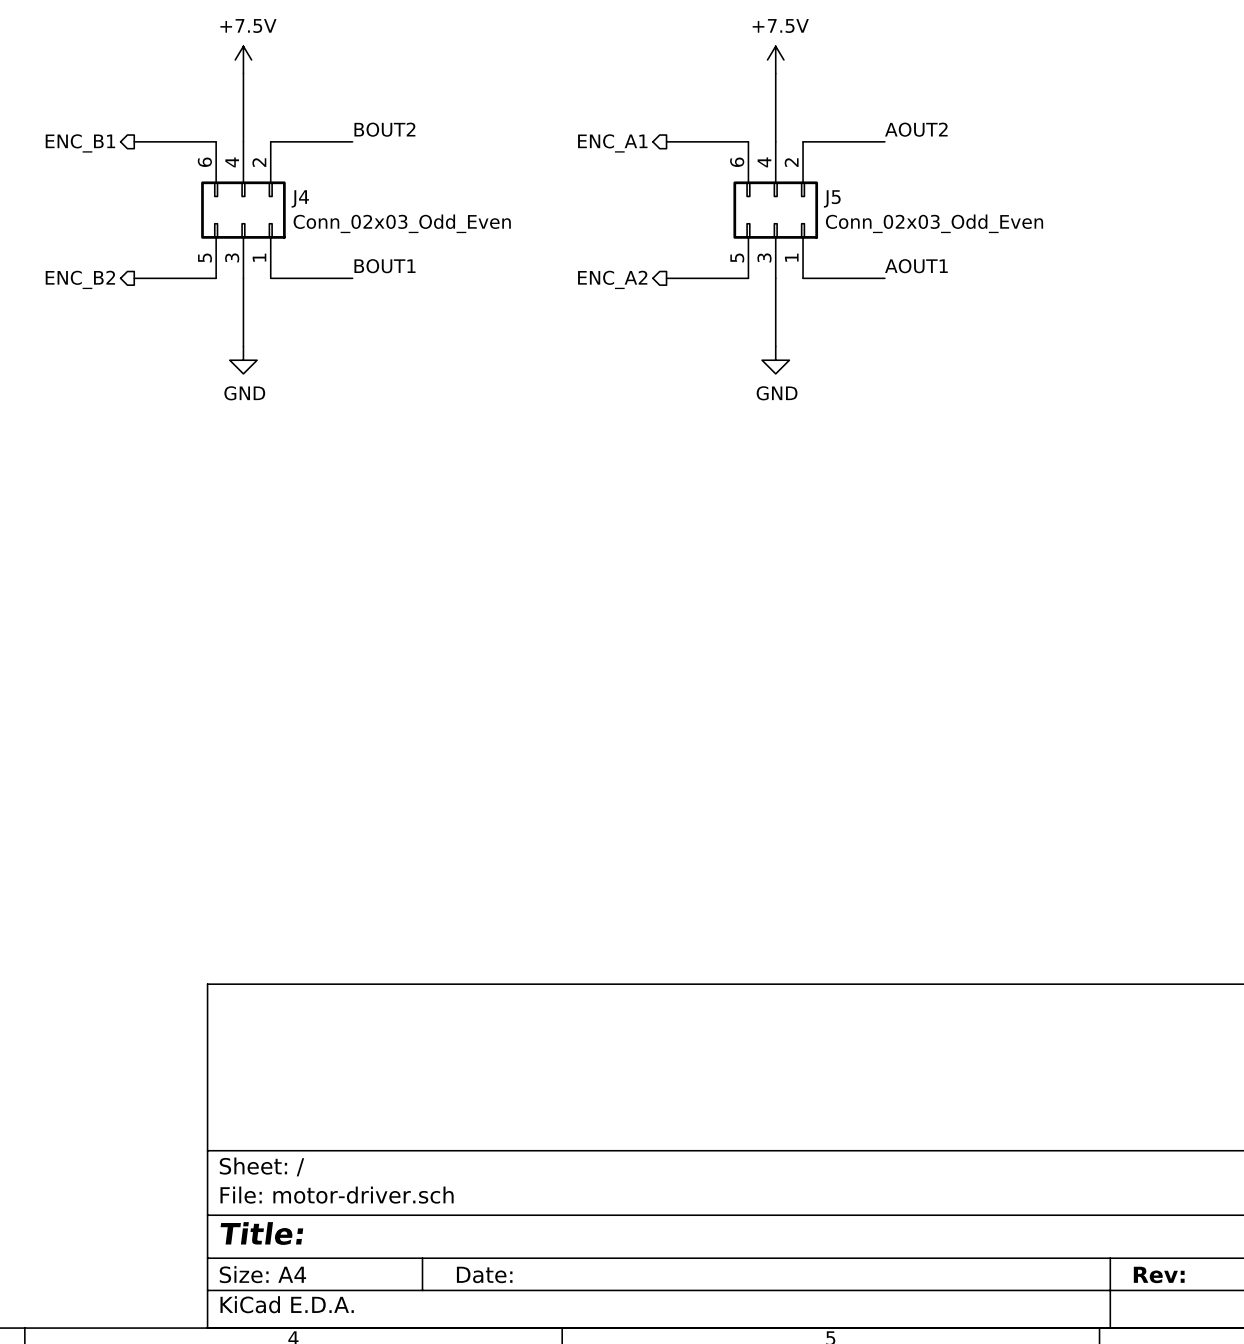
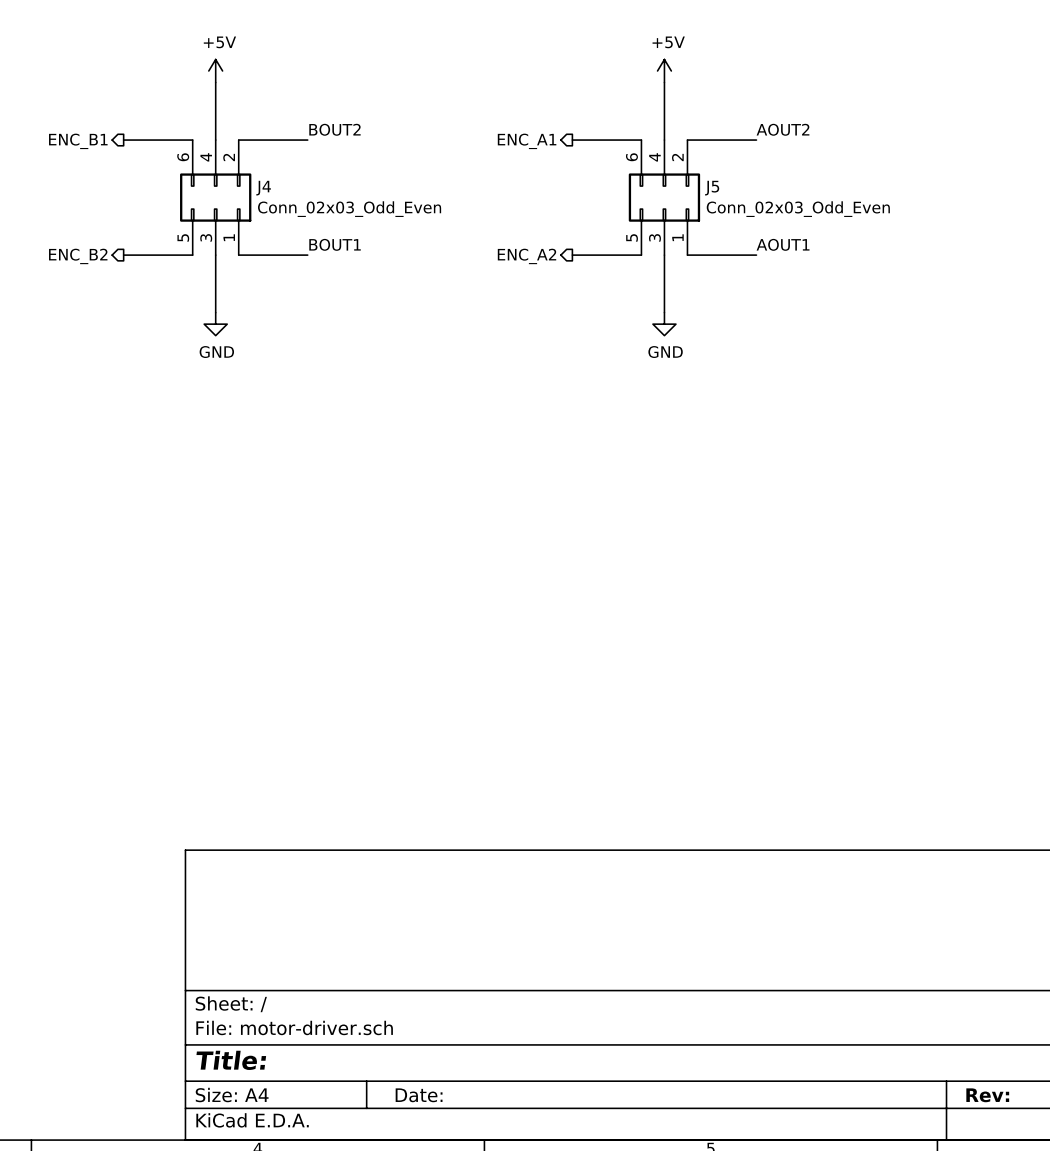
power symbol: +7.5V (243, 59) -> +5V (215, 71)
power symbol: +7.5V (775, 59) -> +5V (664, 71)

